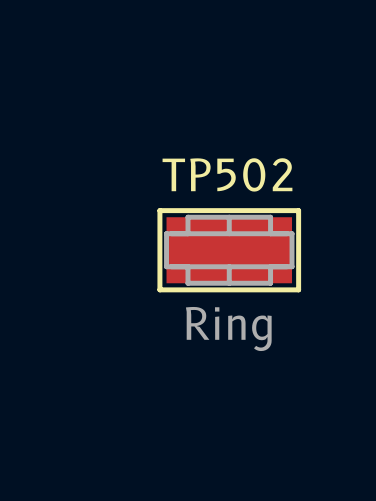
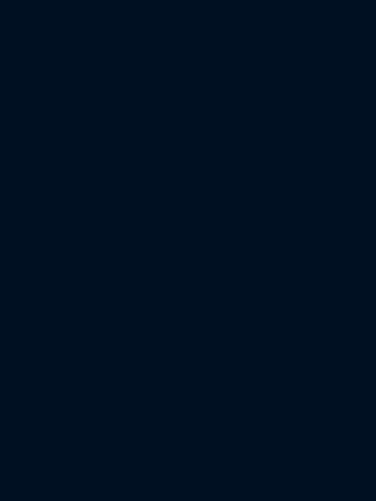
TP502: Ring (229, 250) -> none

